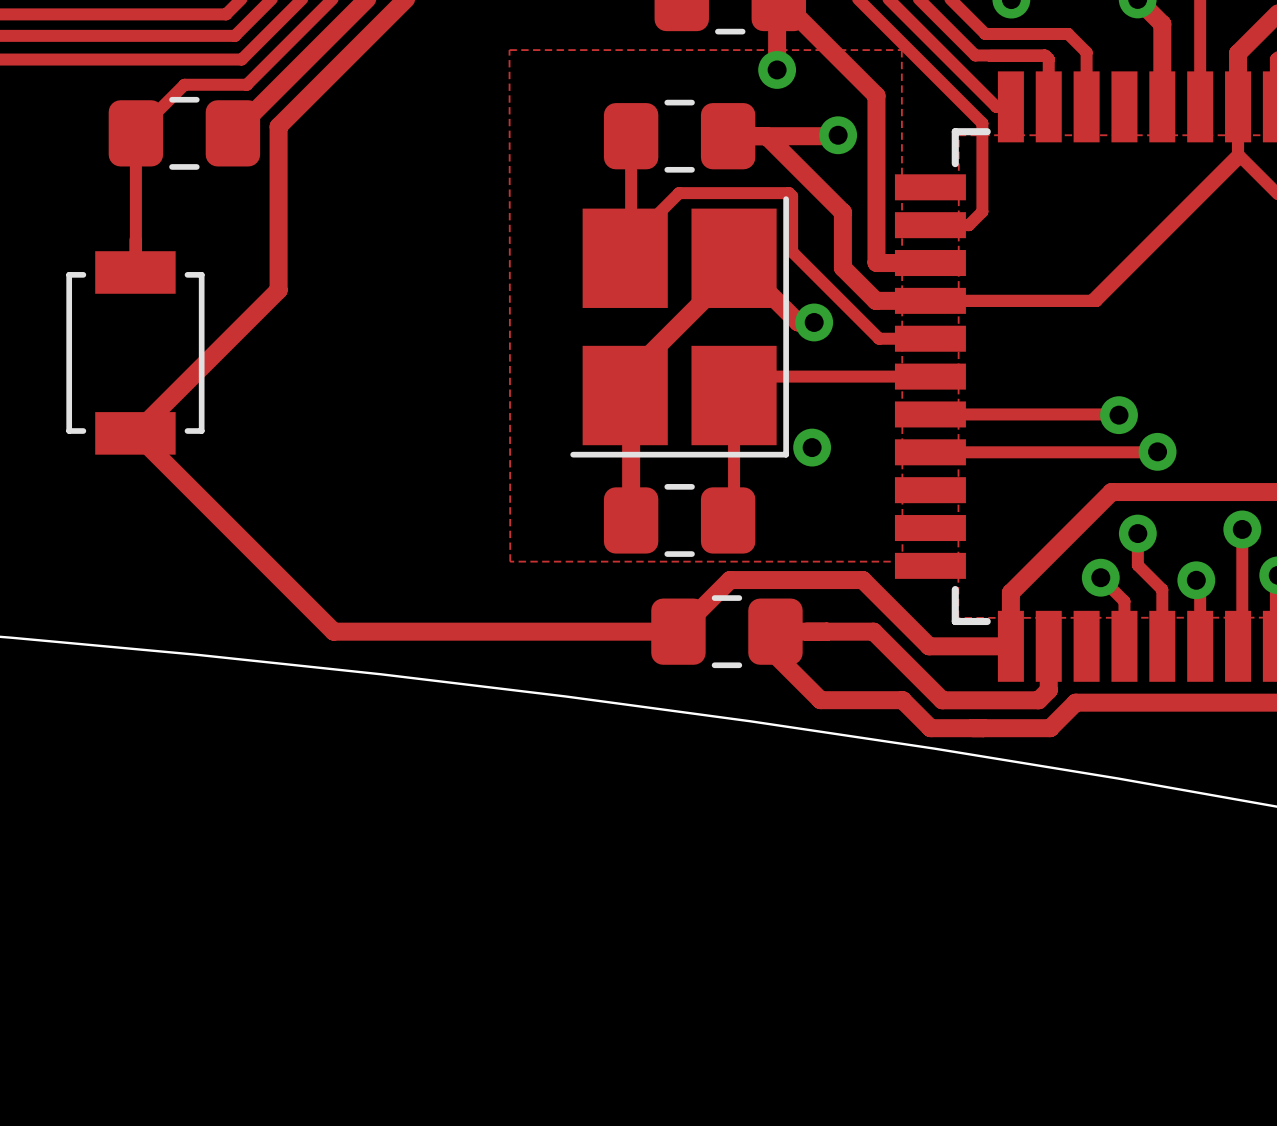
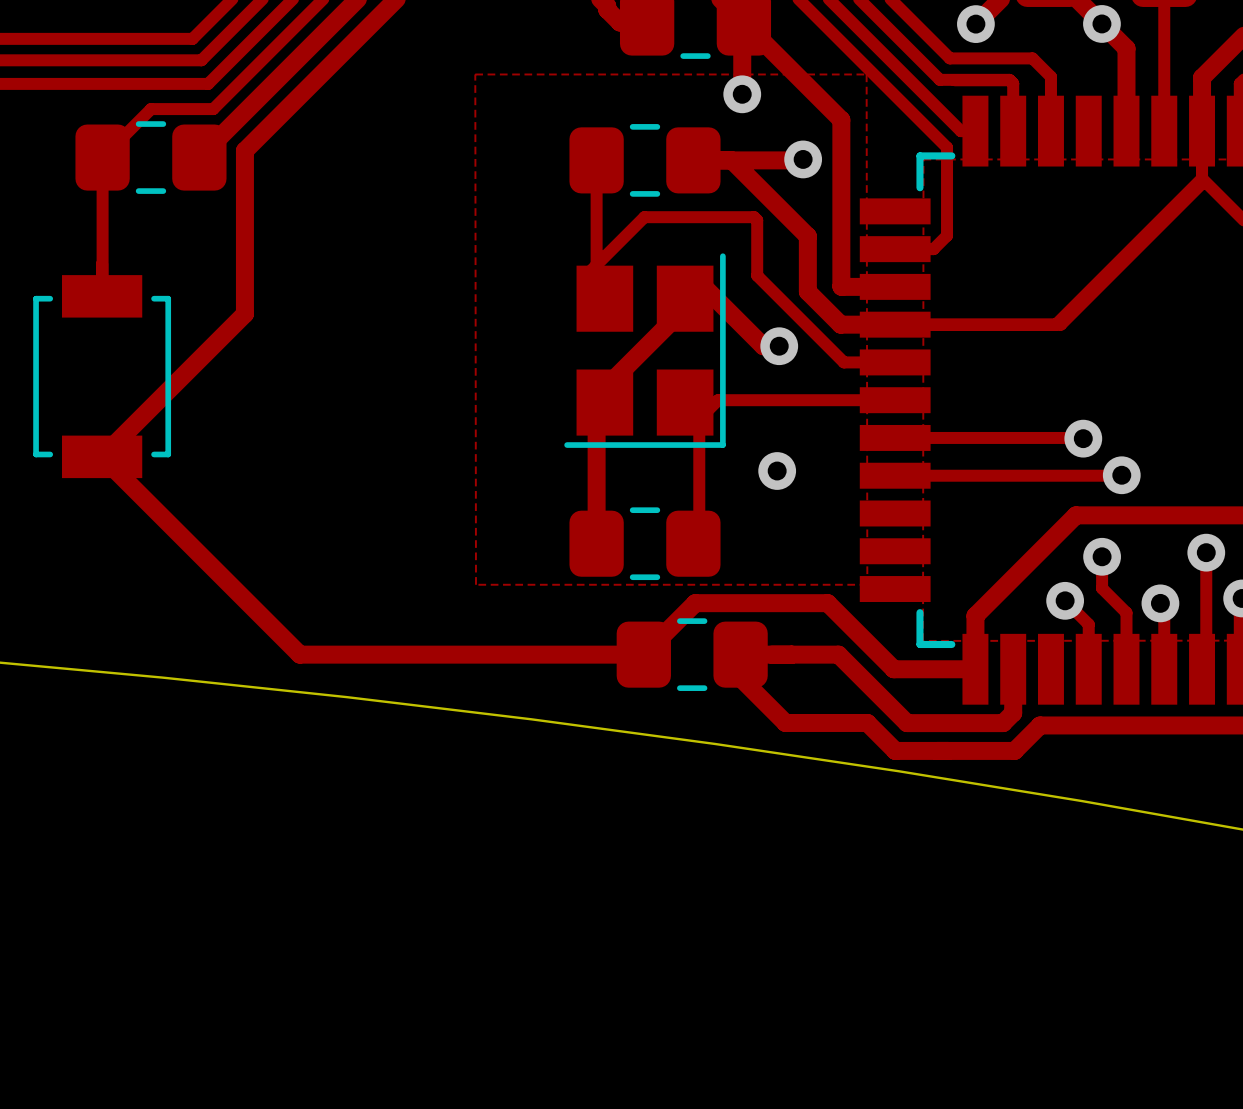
part footprint: [570, 196, 789, 458] -> [564, 253, 726, 448]

